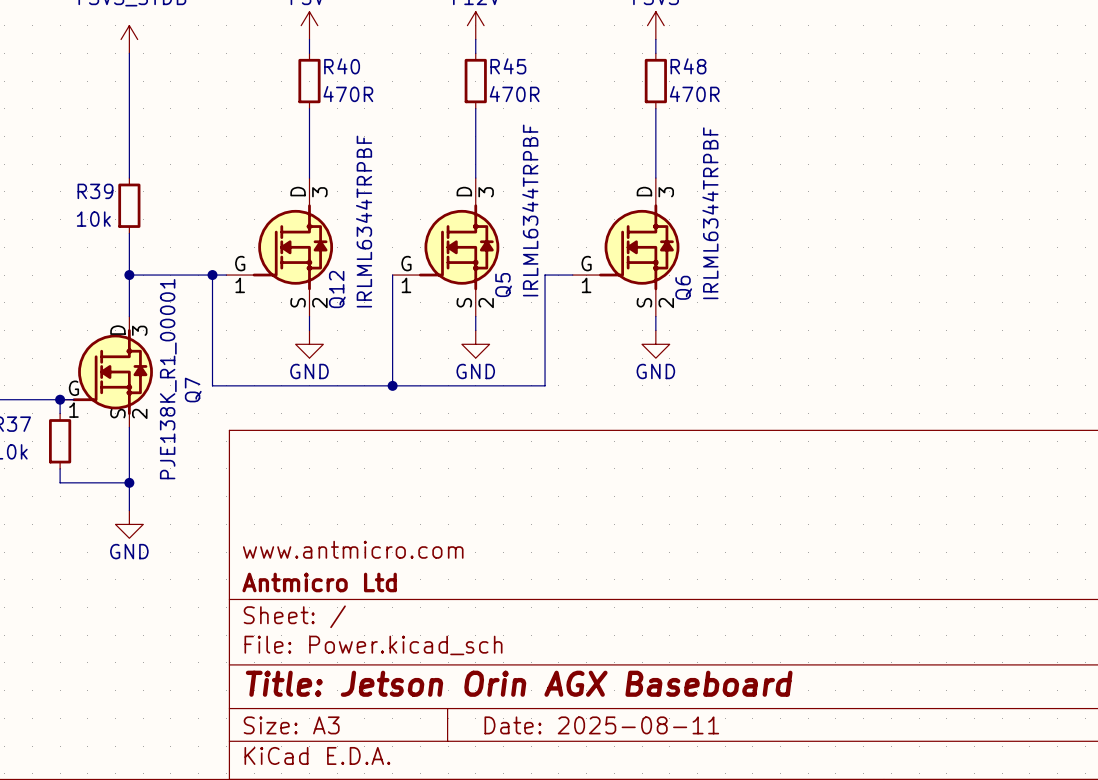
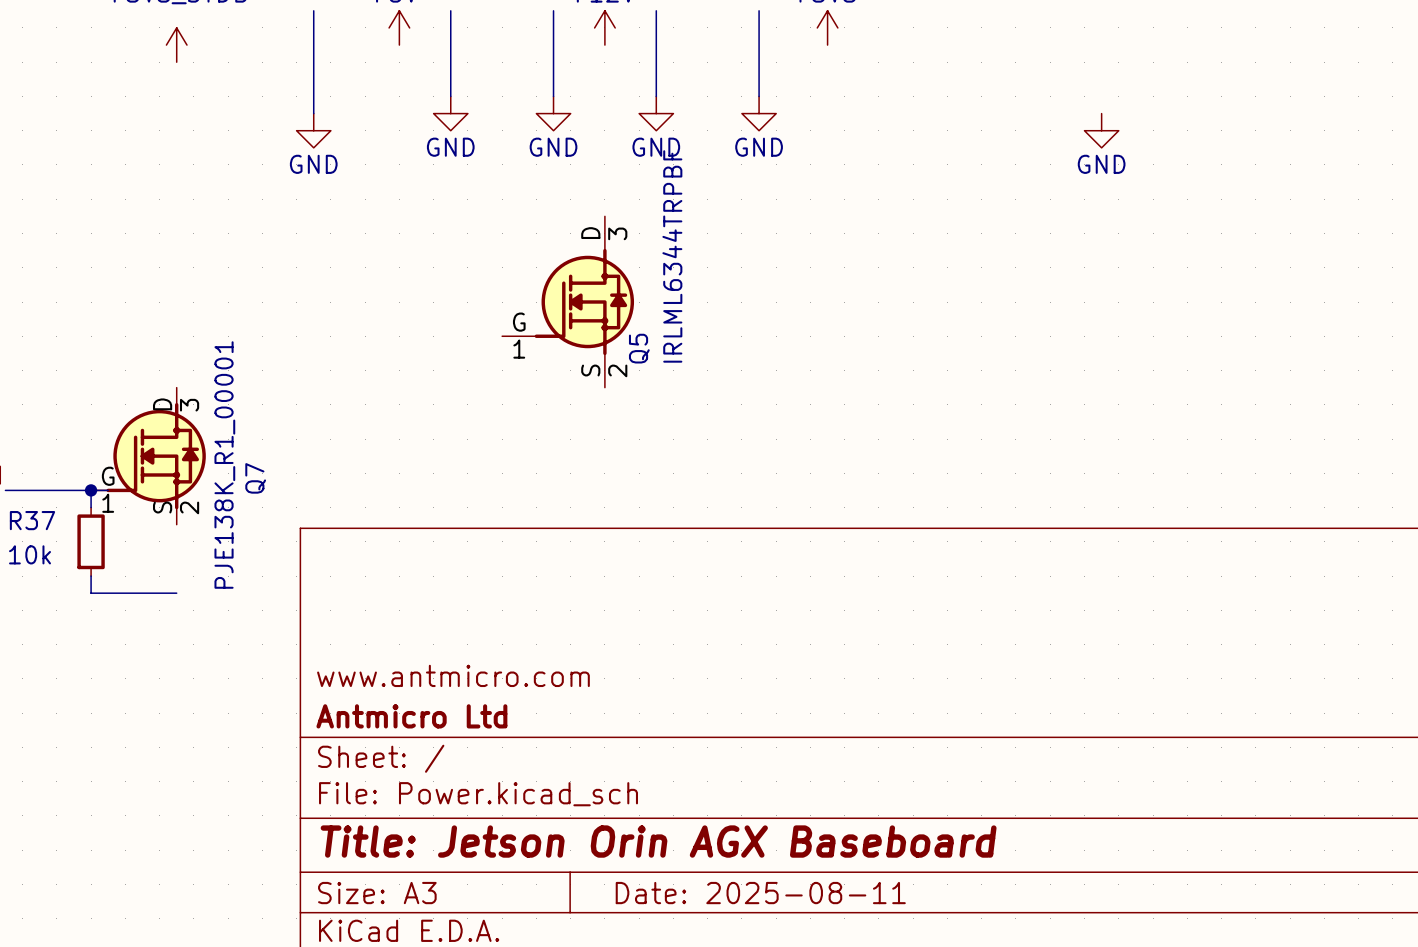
wire: none -> (553, 10) (553, 96)
wire: (309, 39) (309, 53) -> none
wire: (475, 39) (475, 53) -> none
wire: (655, 39) (655, 53) -> none
wire: (129, 53) (129, 178) -> none
R40: (309, 81) -> none
R45: (475, 81) -> none
R48: (655, 81) -> none
power symbol: none -> GND (450, 113)
power symbol: none -> GND (553, 113)
power symbol: none -> GND (656, 113)
power symbol: none -> GND (759, 113)
power symbol: none -> GND (313, 130)
wire: (309, 108) (309, 178) -> (450, 10) (450, 96)
wire: (475, 108) (475, 178) -> (656, 10) (656, 96)
wire: (655, 108) (655, 178) -> (759, 10) (759, 96)
power symbol: none -> GND (1101, 130)
R39: (129, 205) -> none
wire: (129, 233) (129, 316) -> (313, 10) (313, 113)
Q12: (279, 247) -> none
Q6: (626, 247) -> none
wire: (129, 275) (226, 275) -> none
junction: (129, 275) -> none
wire: (212, 275) (212, 385) (545, 385) (545, 275) (572, 275) -> none
junction: (212, 275) -> none
wire: (392, 275) (392, 385) -> none
wire: (309, 316) (309, 330) -> none
wire: (475, 316) (475, 330) -> none
wire: (655, 316) (655, 330) -> none
power symbol: GND (309, 344) -> none
power symbol: GND (475, 344) -> none
power symbol: GND (655, 344) -> none
junction: (392, 385) -> none
wire: (129, 427) (129, 510) -> none
junction: (129, 482) -> none
power symbol: GND (129, 524) -> none

